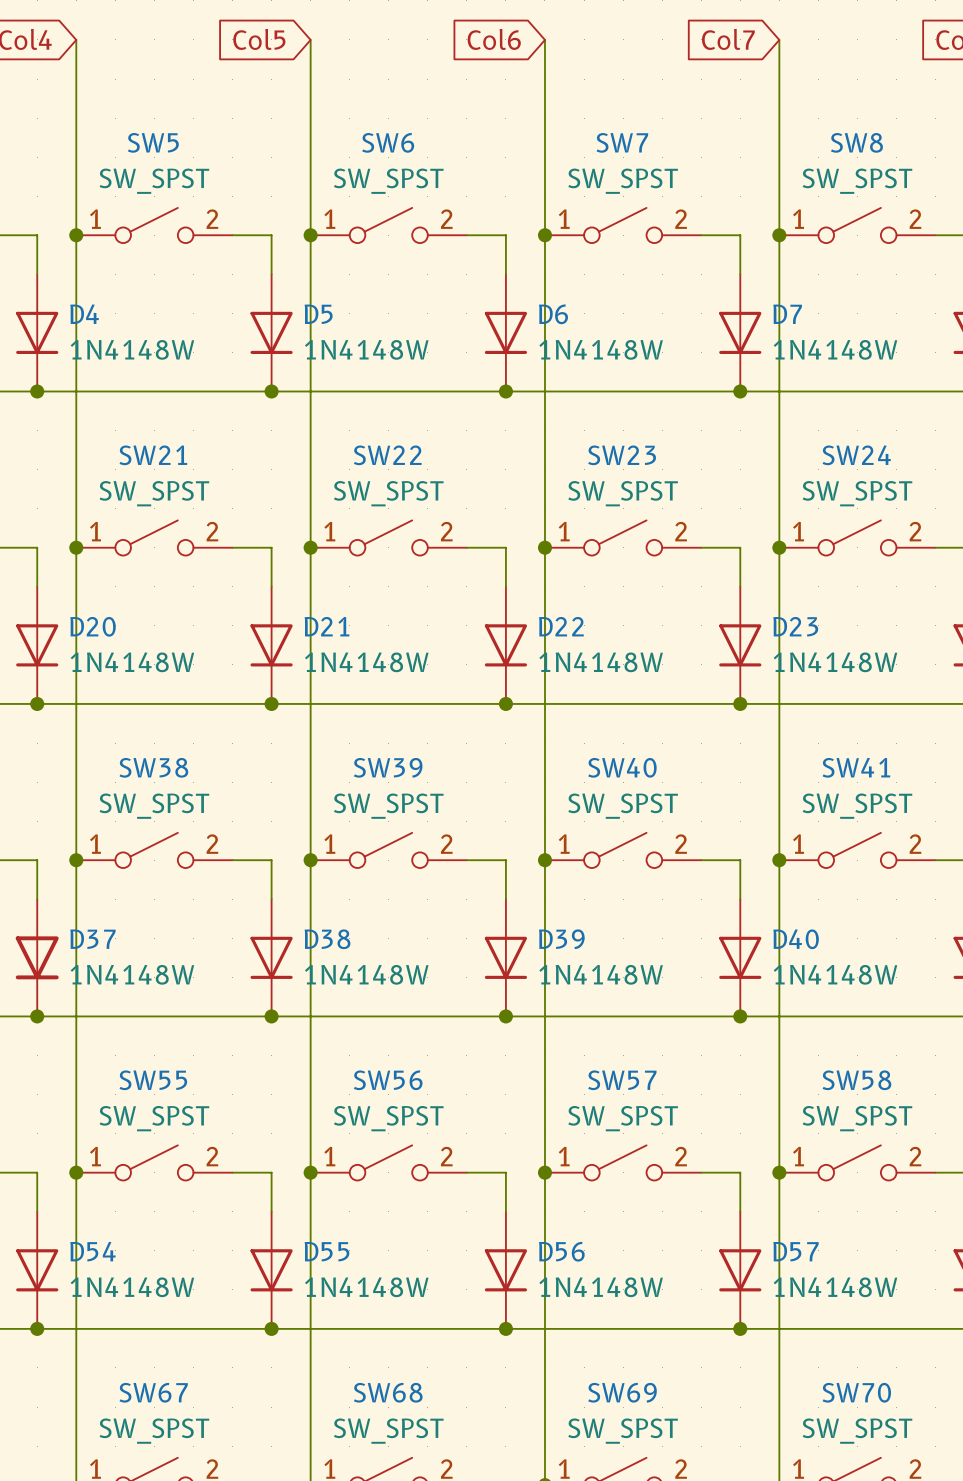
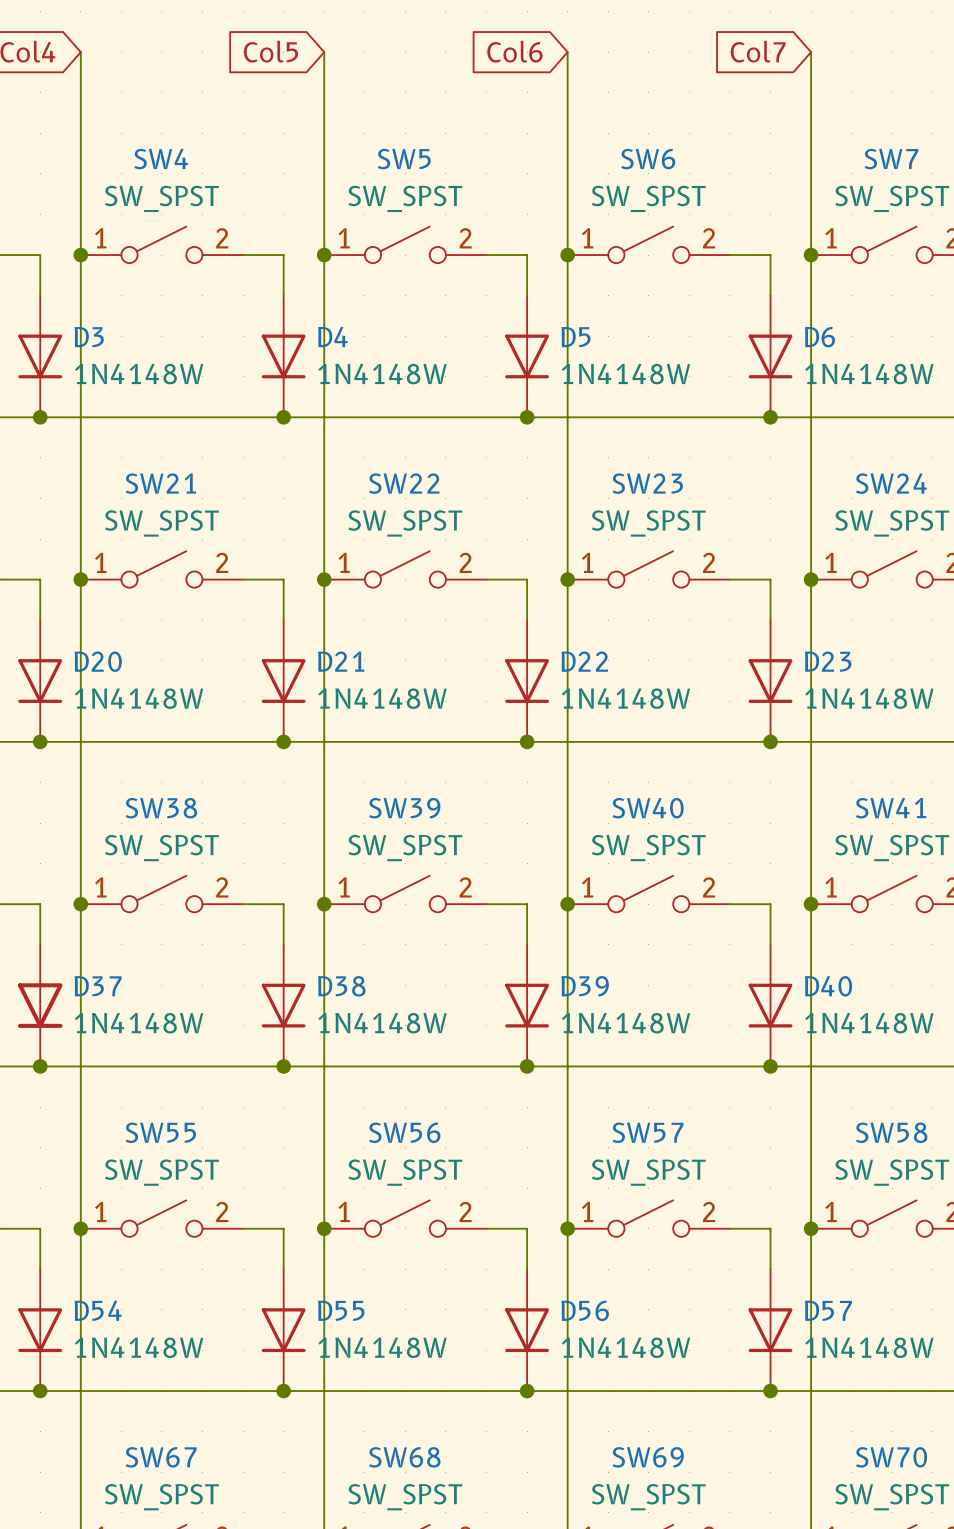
SW5 name: SW5 (153, 142) -> SW4 (161, 159)
SW6 name: SW6 (388, 142) -> SW5 (404, 159)
SW7 name: SW7 (622, 142) -> SW6 (648, 159)
SW8 name: SW8 (856, 142) -> SW7 (891, 159)
D4 name: D4 (84, 314) -> D3 (89, 337)
D5 name: D5 (318, 314) -> D4 (332, 337)
D6 name: D6 (553, 314) -> D5 (575, 337)
D7 name: D7 (787, 314) -> D6 (819, 337)

